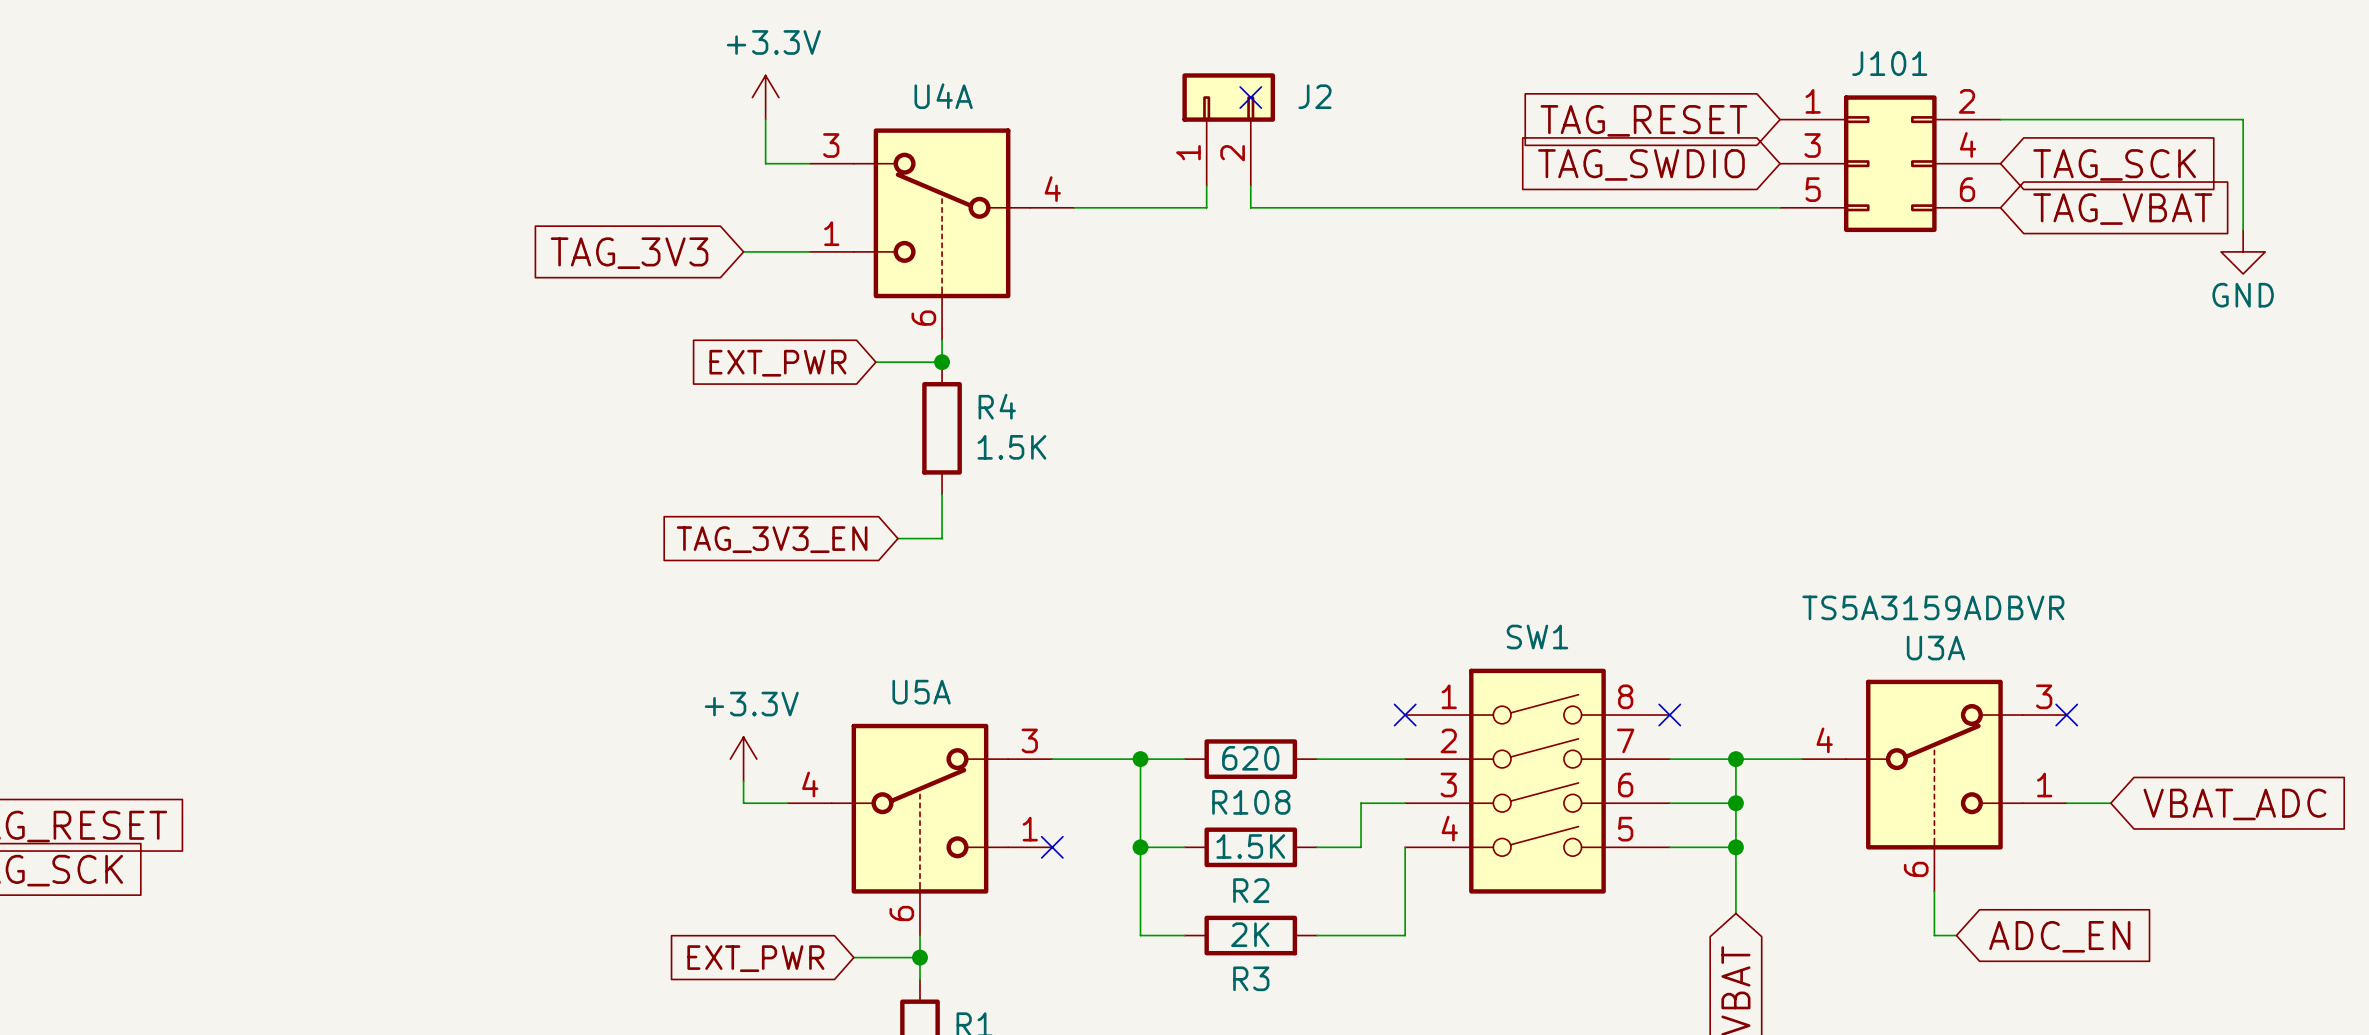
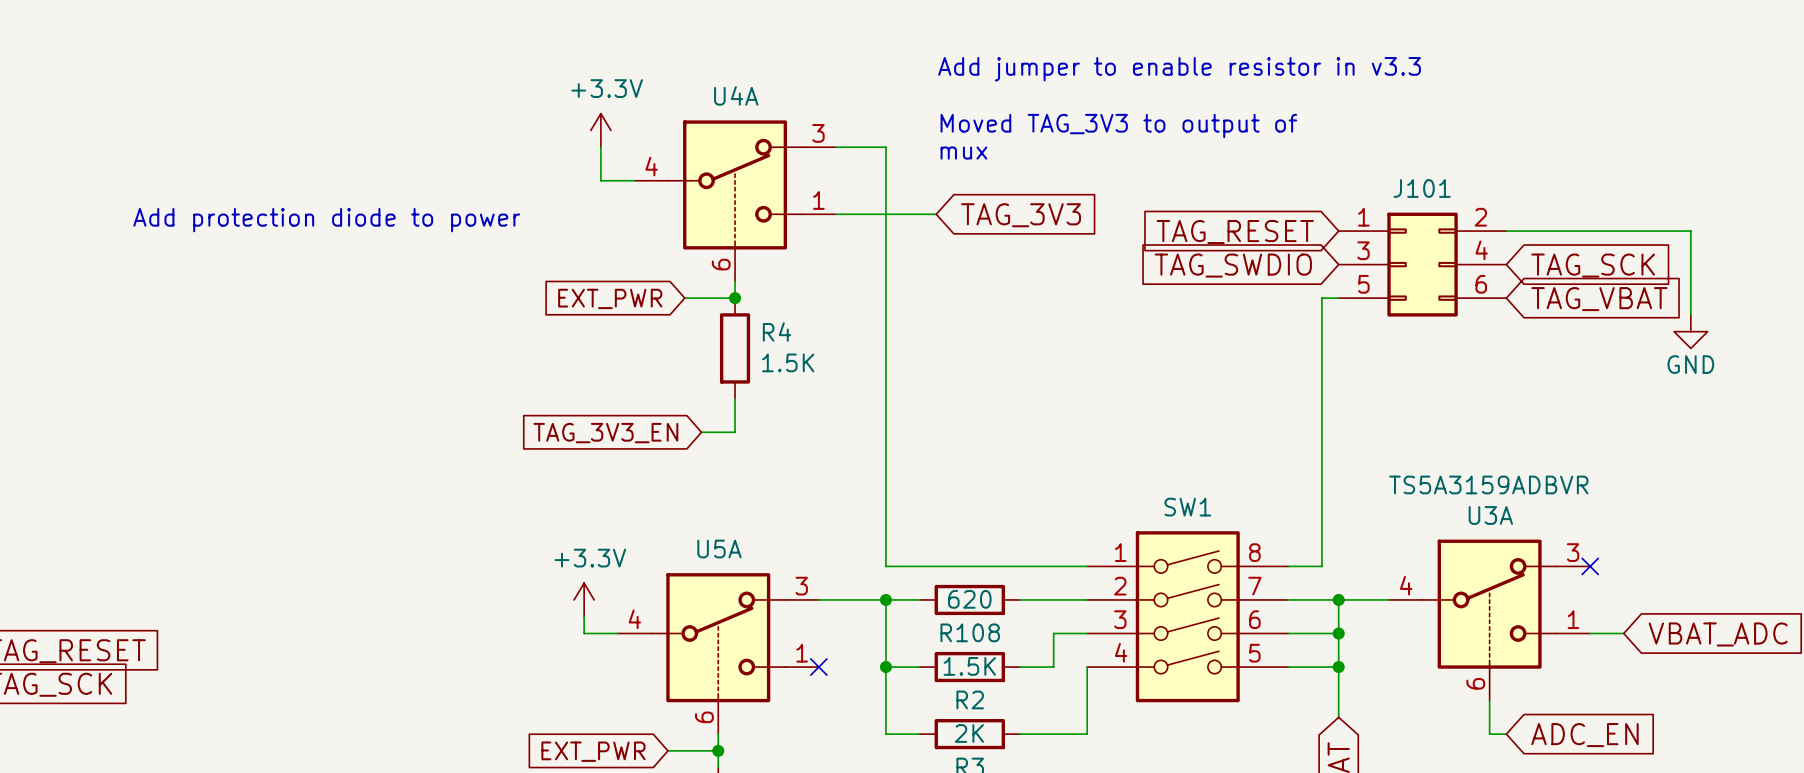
text: none -> Add jumper to enable resistor in v3.3 (1179, 69)
power symbol position: +3.3V (765, 97) -> +3.3V (600, 130)
no-connect mark: (1250, 97) -> none
wire: (765, 119) (765, 163) (809, 163) -> (600, 147) (600, 180) (634, 180)
wire: (2000, 119) (2243, 119) (2243, 229) -> (1506, 231) (1690, 231) (1690, 314)
global label position: TAG_RESET (1643, 120) -> TAG_RESET (1235, 232)
J2: (1228, 129) -> none
text: none -> Moved TAG_3V3 to output of (1118, 126)
wire: none -> (835, 147) (885, 147) (885, 566) (1087, 566)
J101 position: (1890, 163) -> (1422, 264)
global label position: TAG_SWDIO (1641, 164) -> TAG_SWDIO (1233, 265)
global label position: TAG_SCK (2114, 164) -> TAG_SCK (1593, 265)
text: none -> mux (963, 153)
wire: (1206, 185) (1206, 207) (1074, 207) -> none
wire: (1250, 185) (1250, 207) (1780, 207) -> none
global label position: TAG_VBAT (2122, 209) -> TAG_VBAT (1599, 299)
U4A flip: as is (942, 213) -> left-right (735, 184)
wire: (743, 251) (809, 251) -> none
wire: none -> (835, 214) (936, 214)
power symbol position: GND (2243, 251) -> GND (1690, 331)
global label: TAG_3V3 (629, 253) -> none
global label: none -> TAG_3V3 (1021, 215)
text: none -> Add protection diode to power (326, 220)
wire: none -> (1338, 298) (1321, 298) (1321, 566) (1288, 566)
no-connect mark: (1405, 715) -> none
no-connect mark: (1669, 715) -> none

